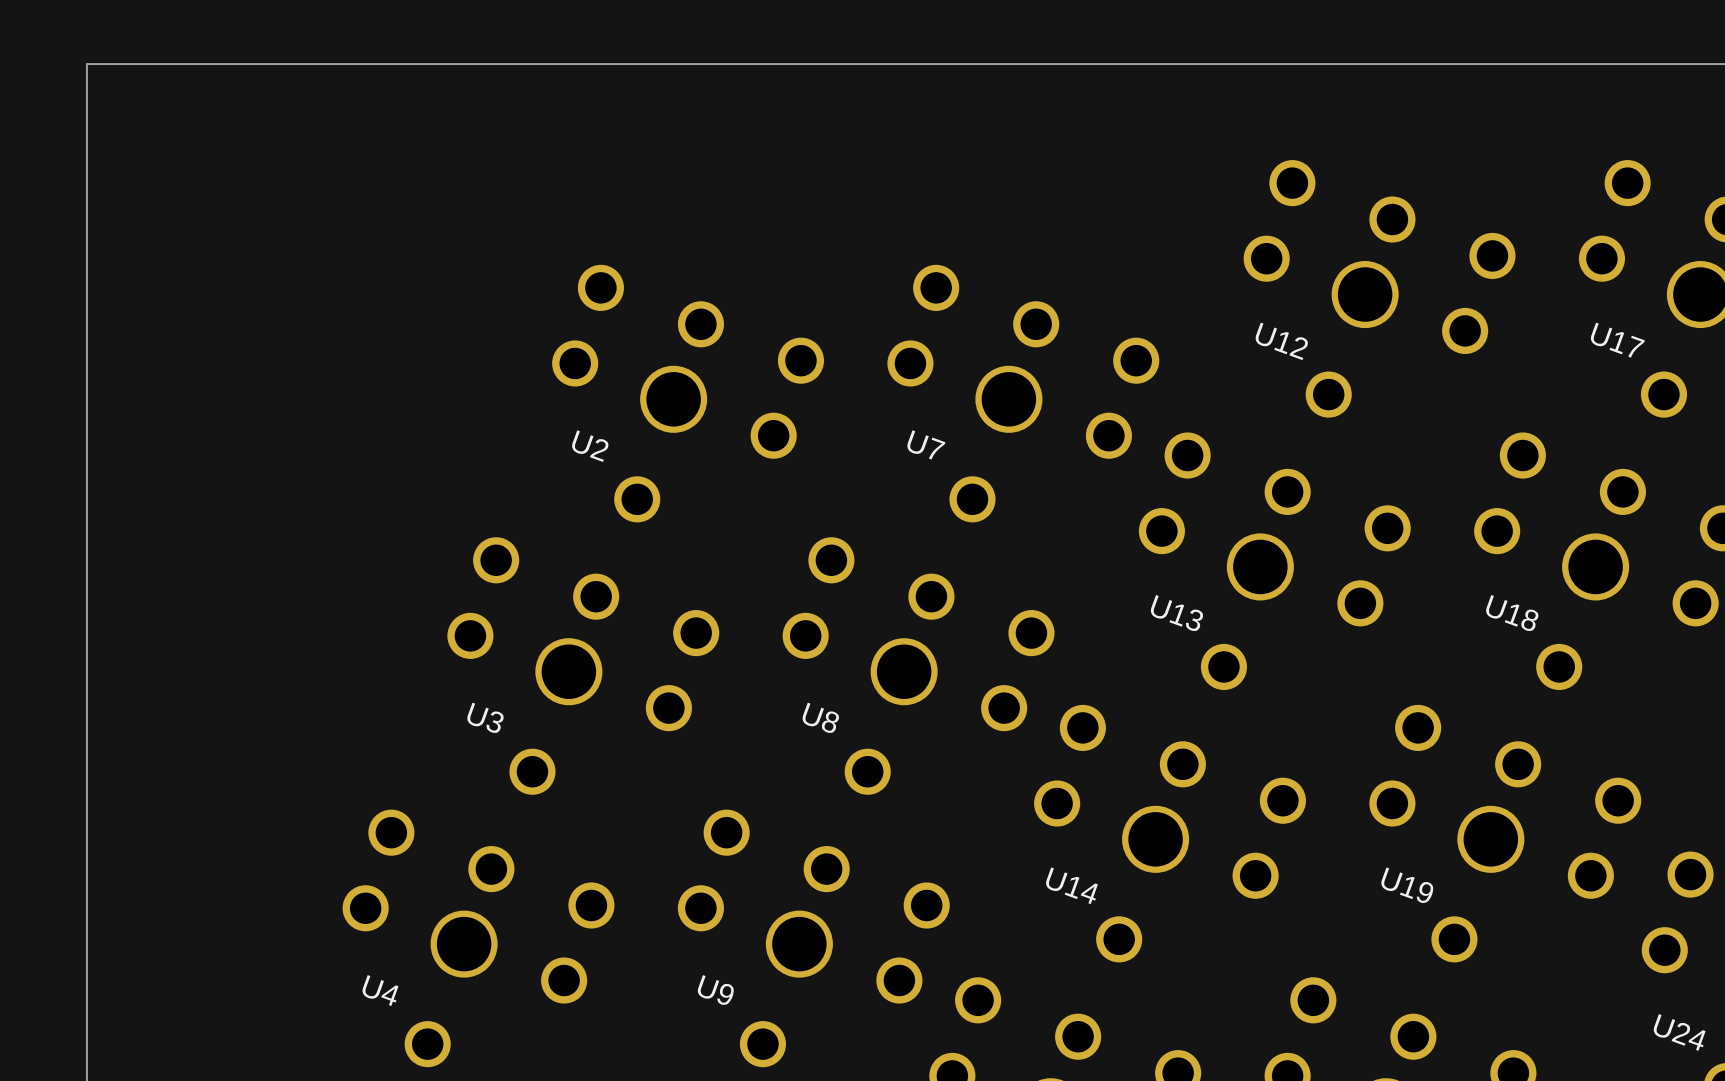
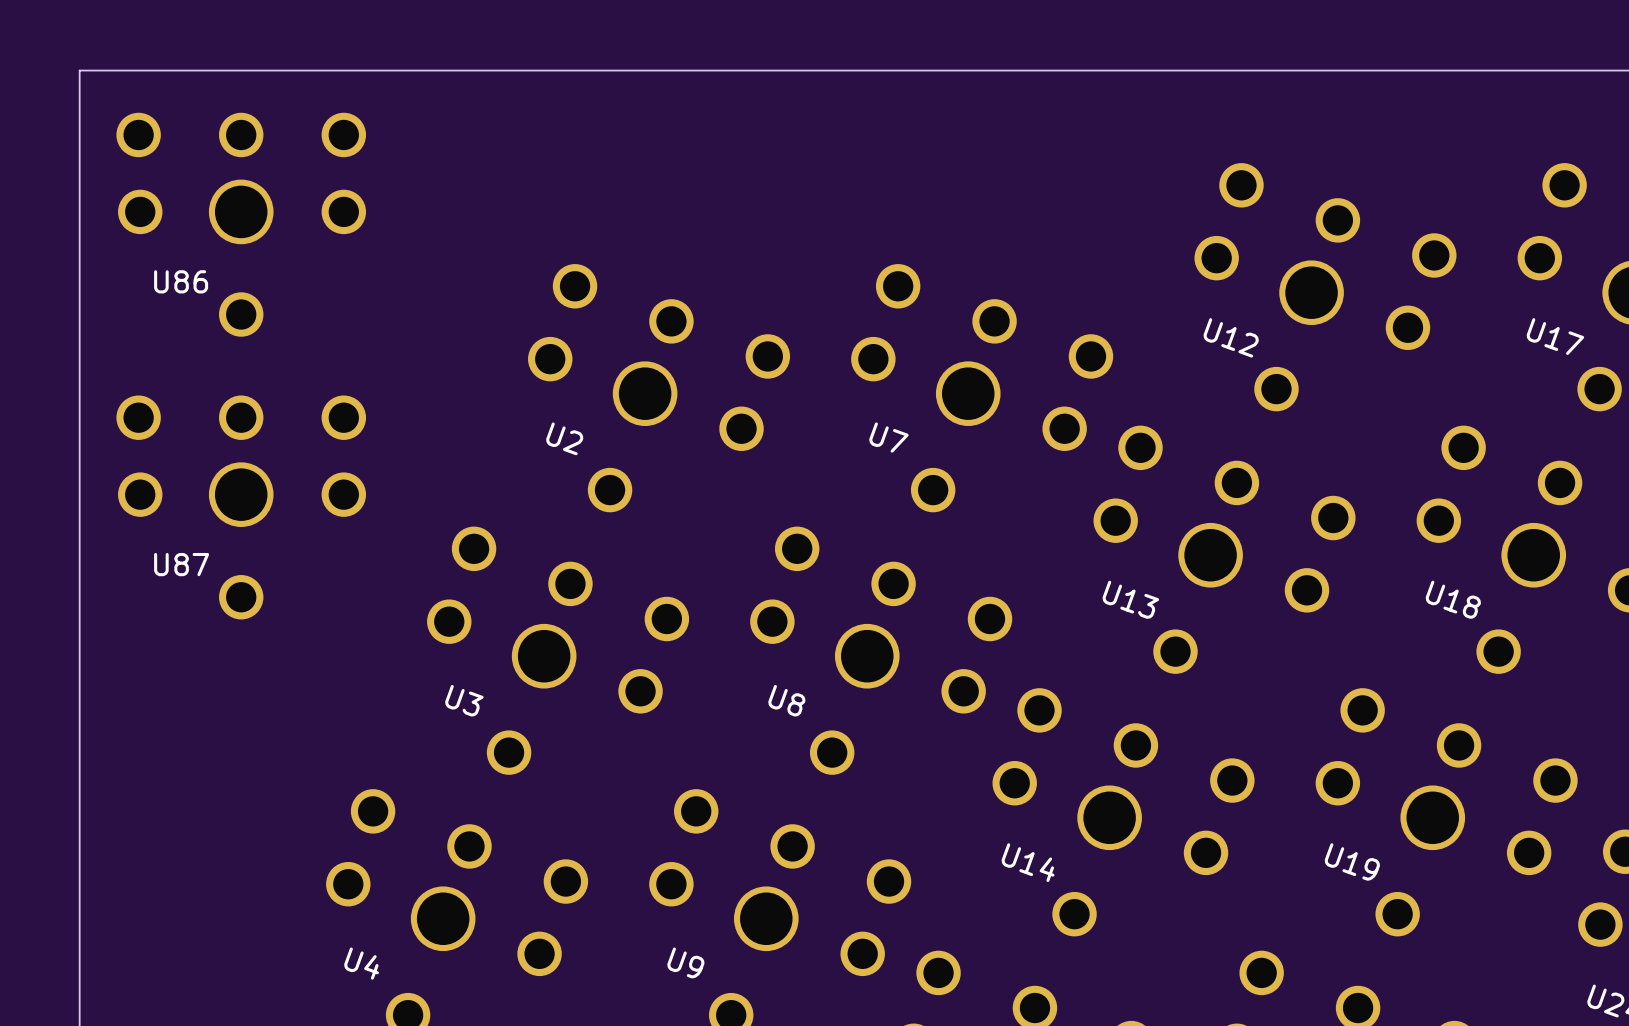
U86: none -> (241, 224)
U87: none -> (241, 507)

